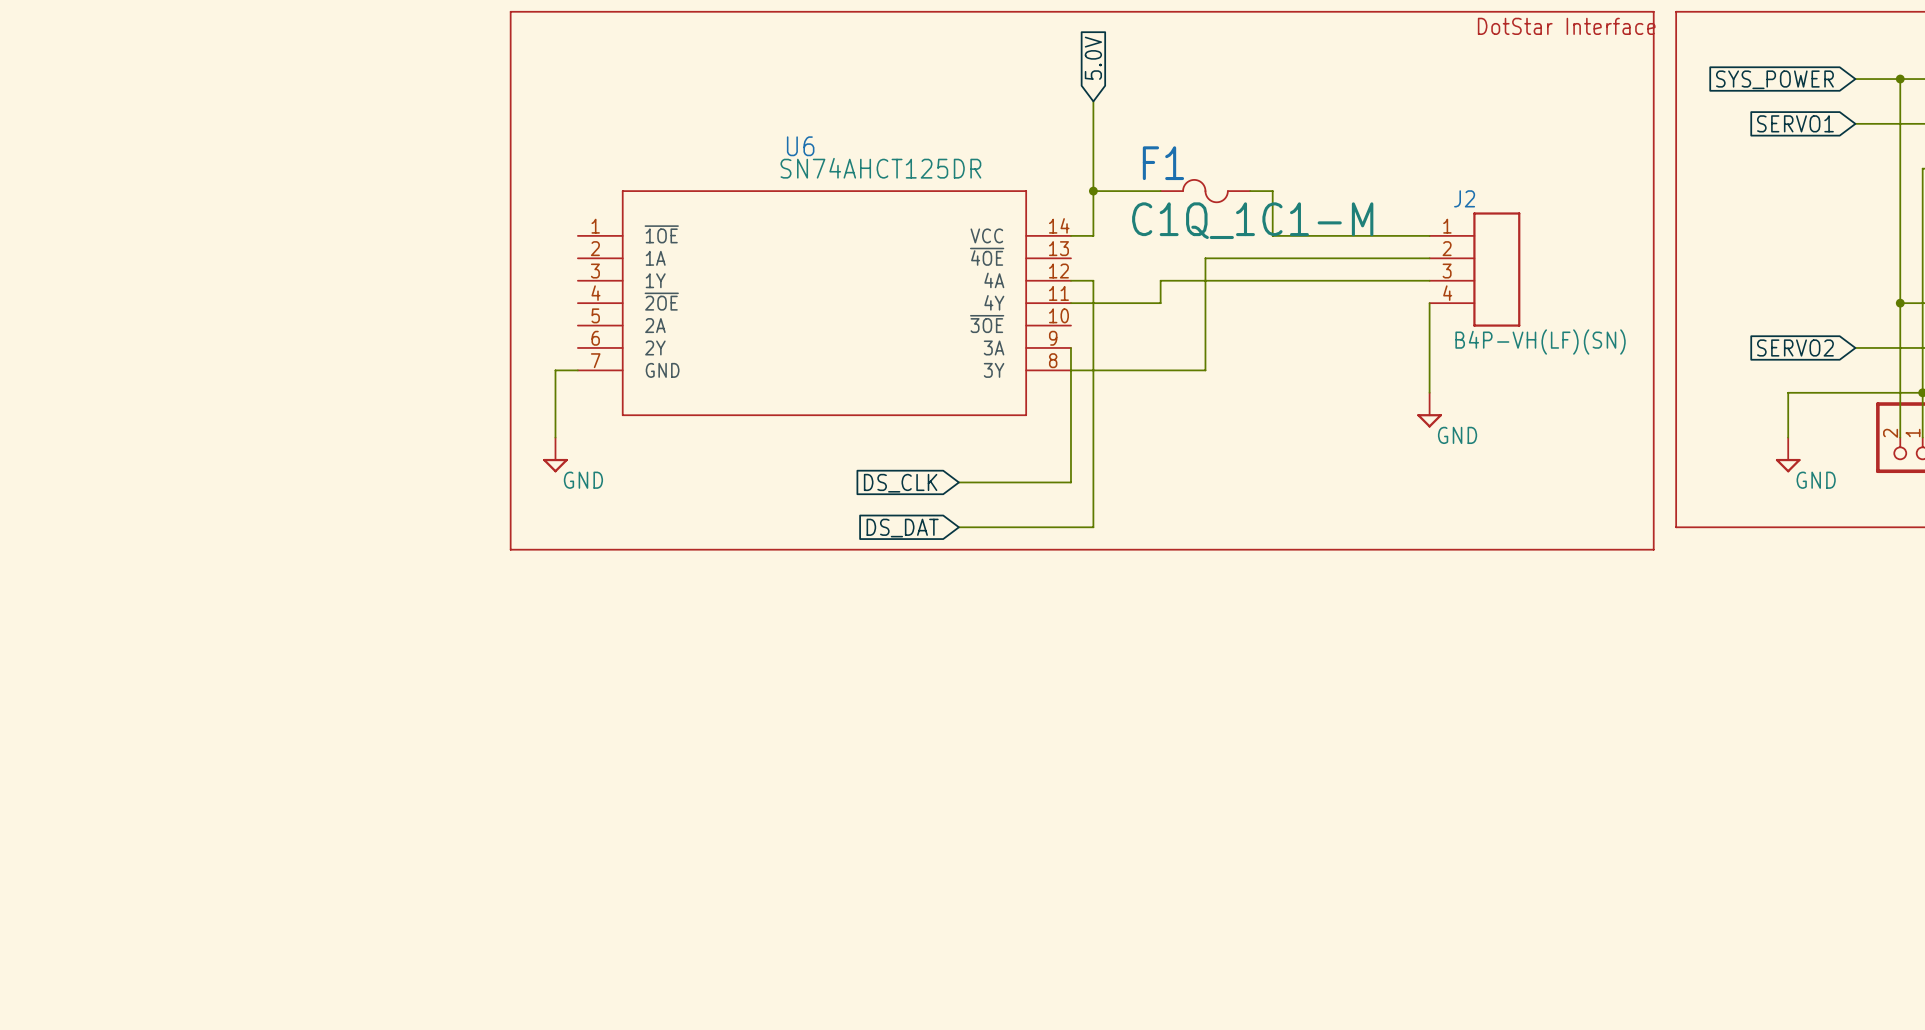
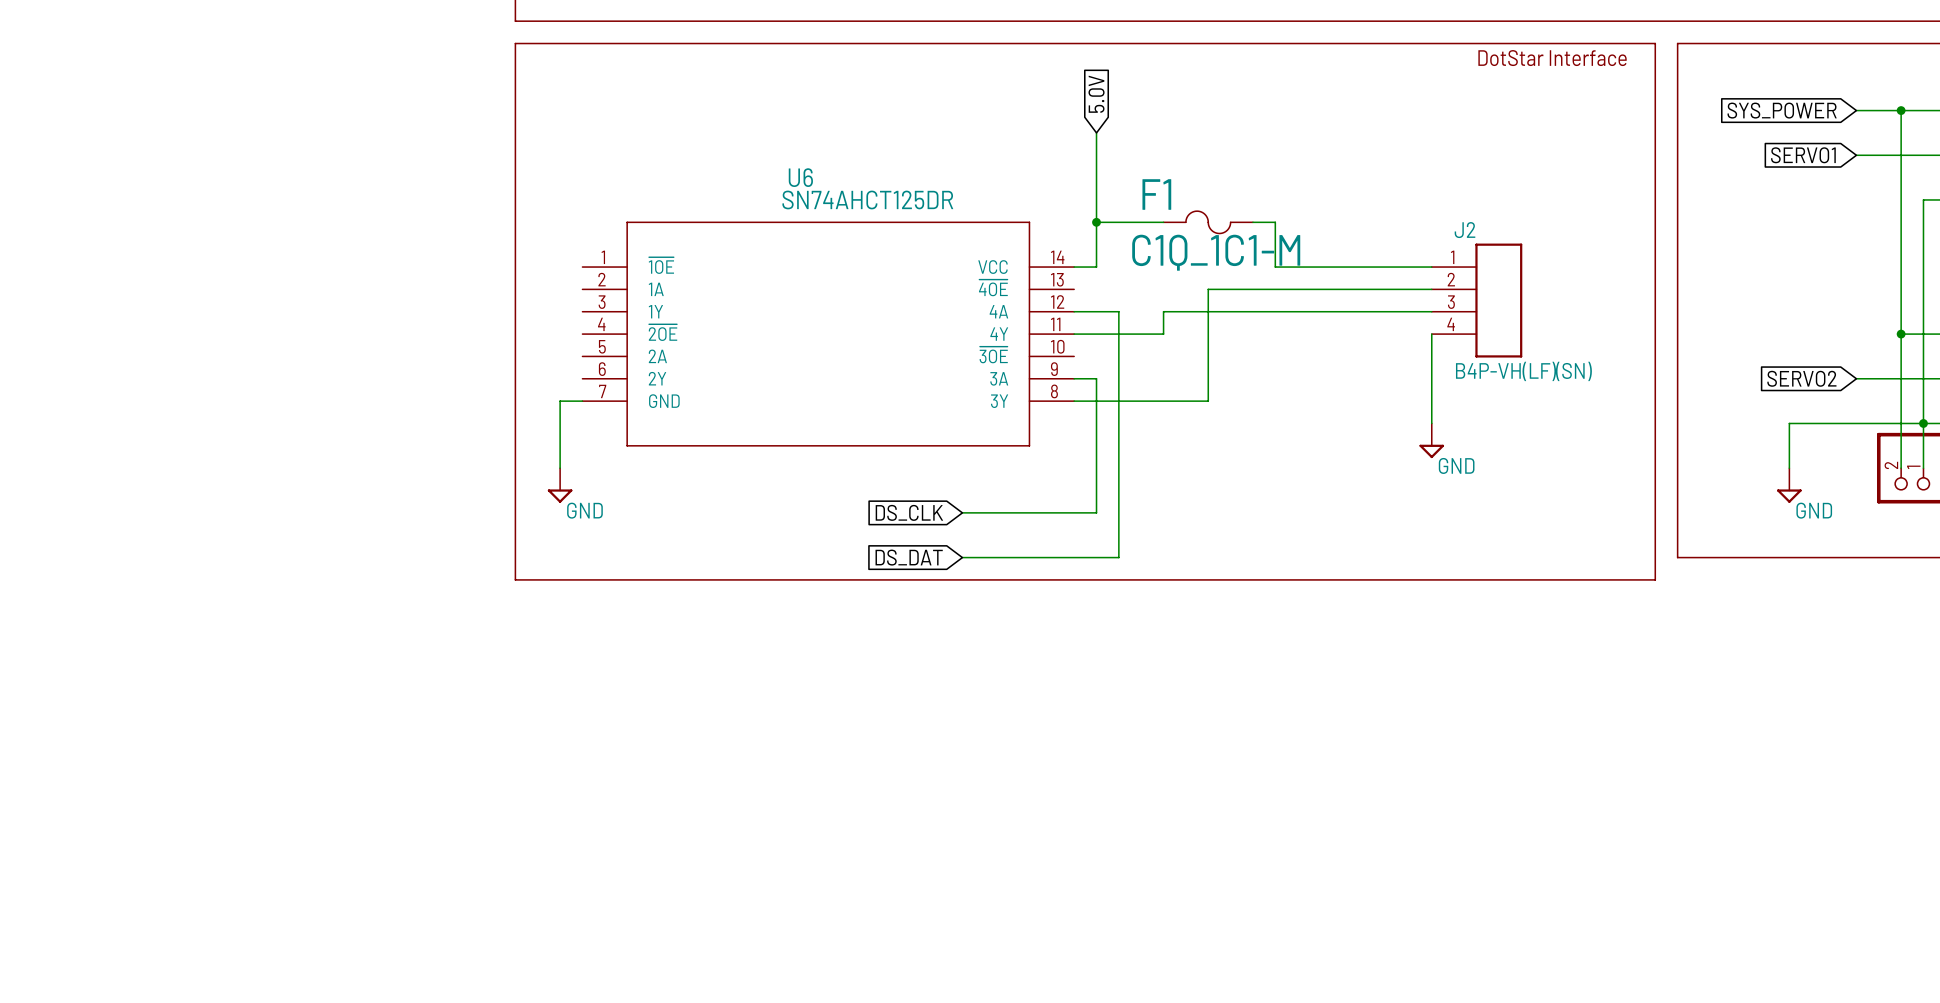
wire: (1093, 280) (1093, 347) -> (1074, 378) (1096, 378)
wire: none -> (1096, 311) (1118, 311) (1118, 557) (1096, 557)
wire: (1070, 347) (1070, 482) -> none
wire: (1093, 482) (1093, 527) -> (1096, 512) (1074, 512)

